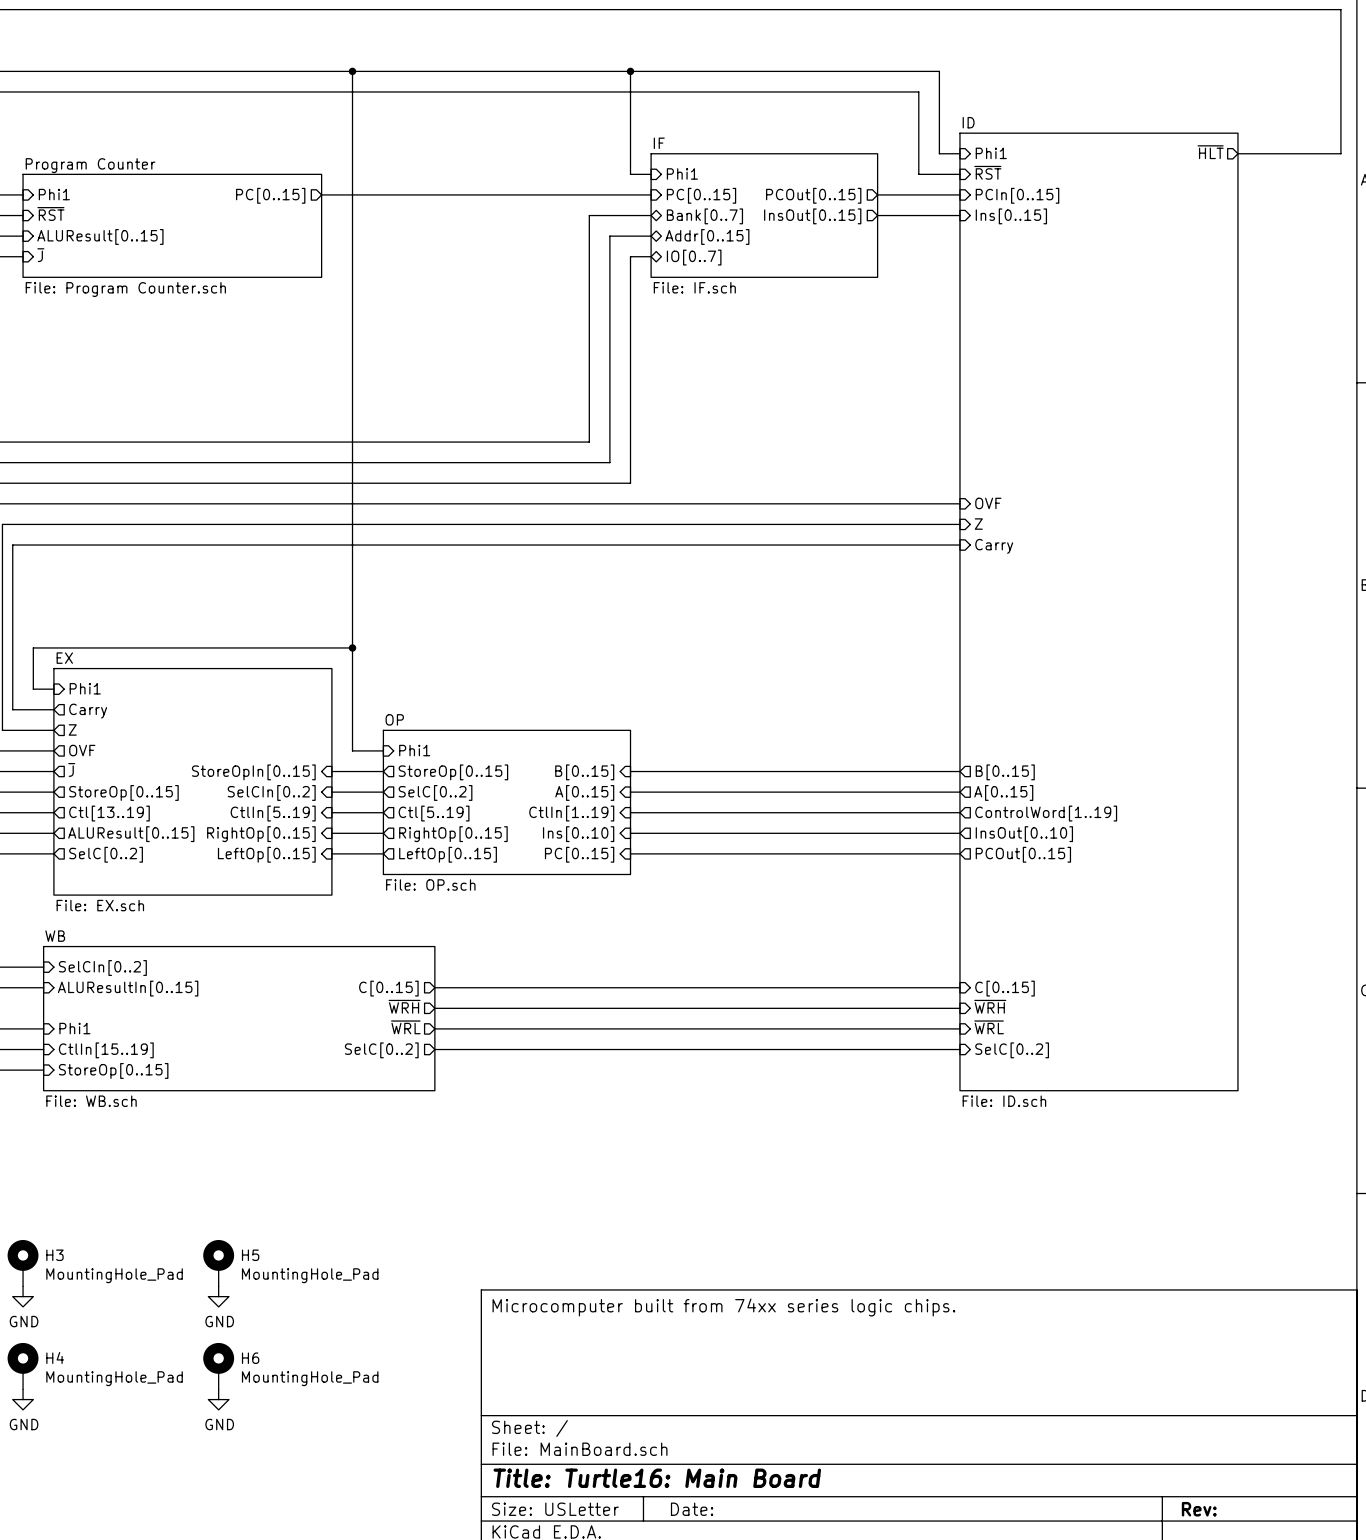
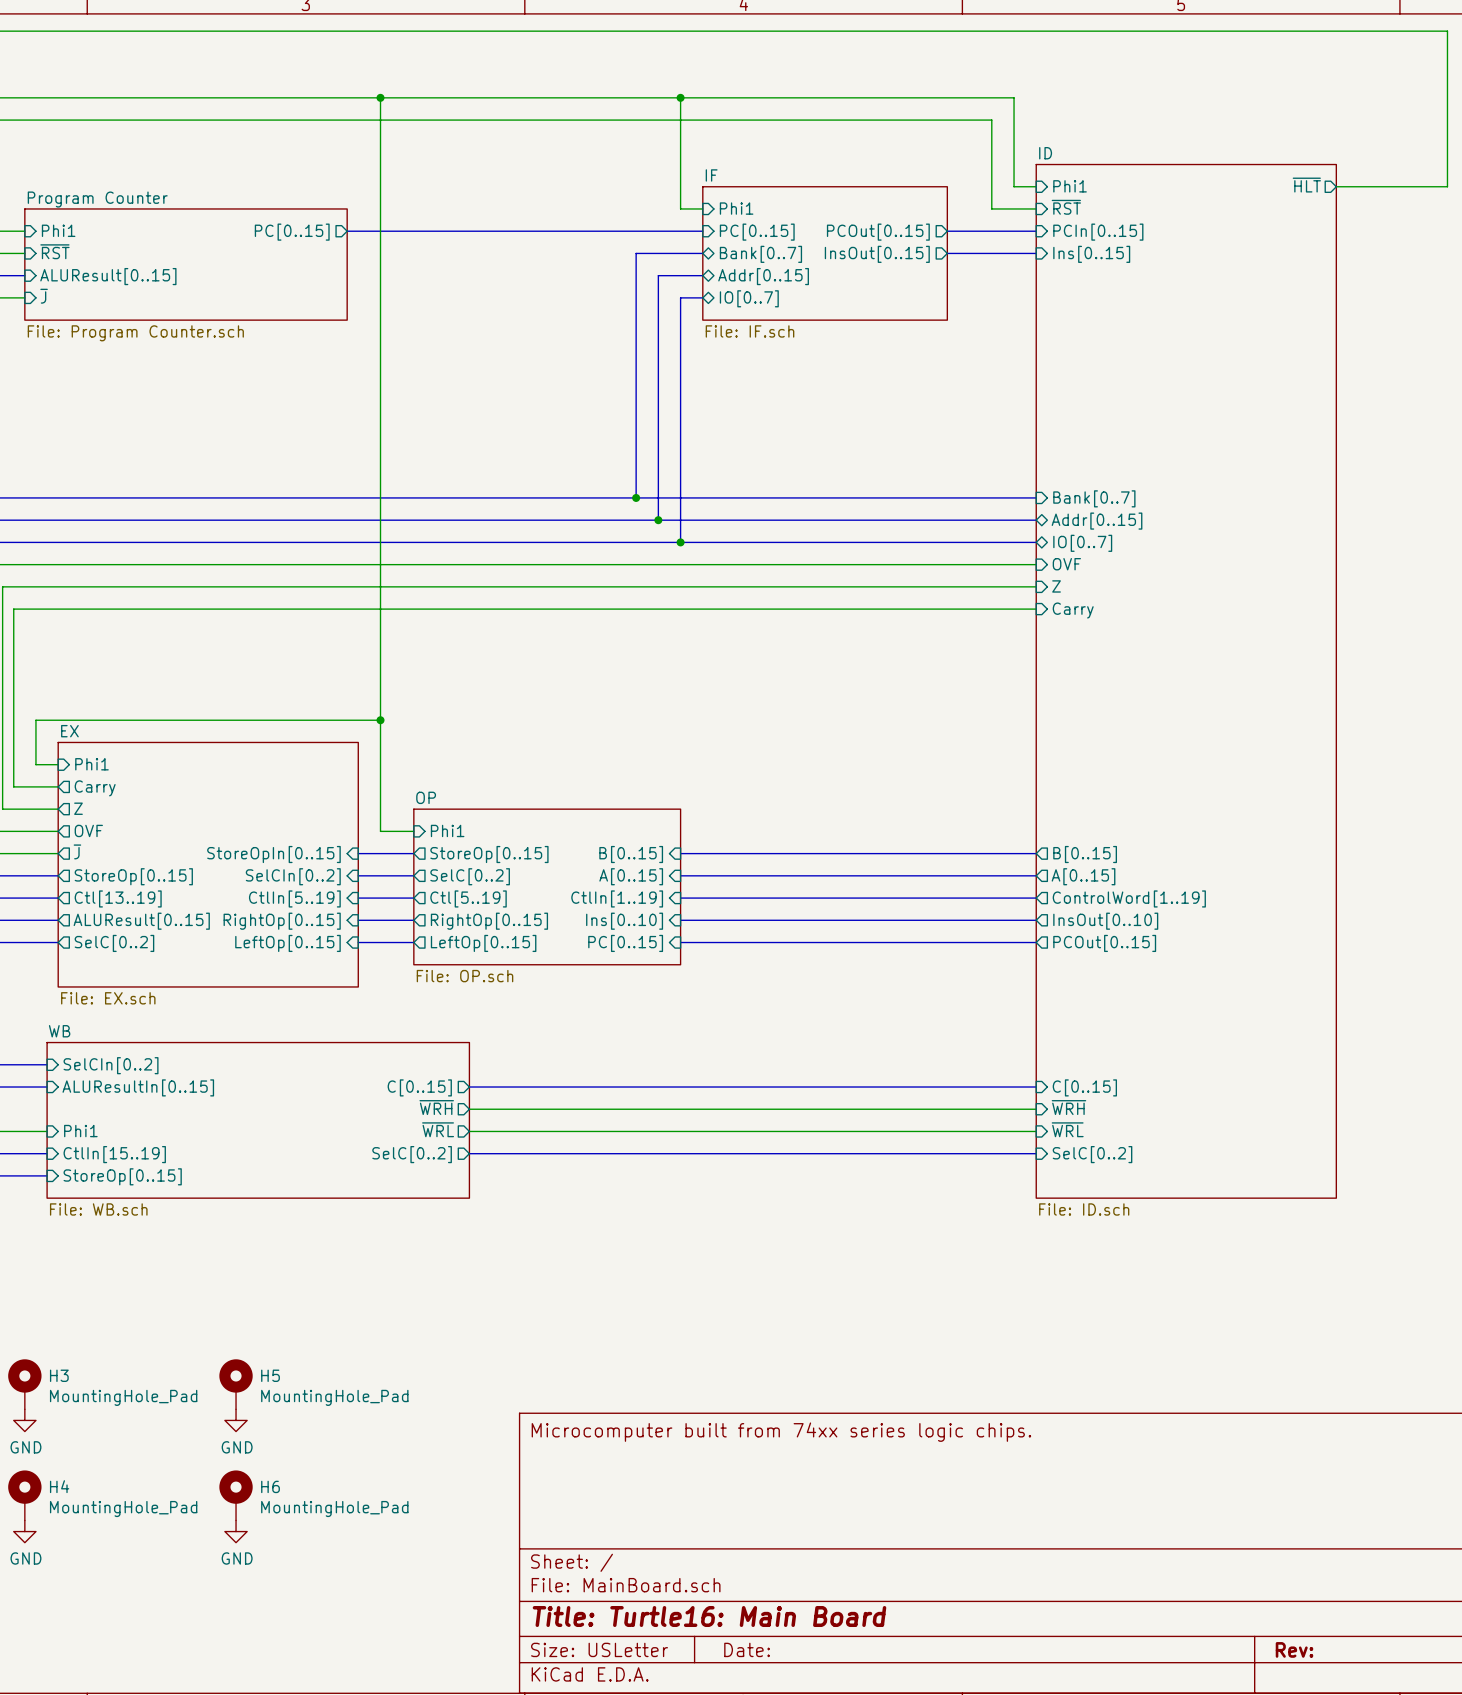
bus: none -> (636, 497) (1036, 497)
junction: none -> (636, 497)
sheet pin: none -> Bank[0..7] (1094, 498)
bus: none -> (658, 520) (1036, 520)
junction: none -> (658, 520)
sheet pin: none -> Addr[0..15] (1097, 521)
bus: none -> (680, 542) (1036, 542)
junction: none -> (680, 542)
sheet pin: none -> IO[0..7] (1082, 543)

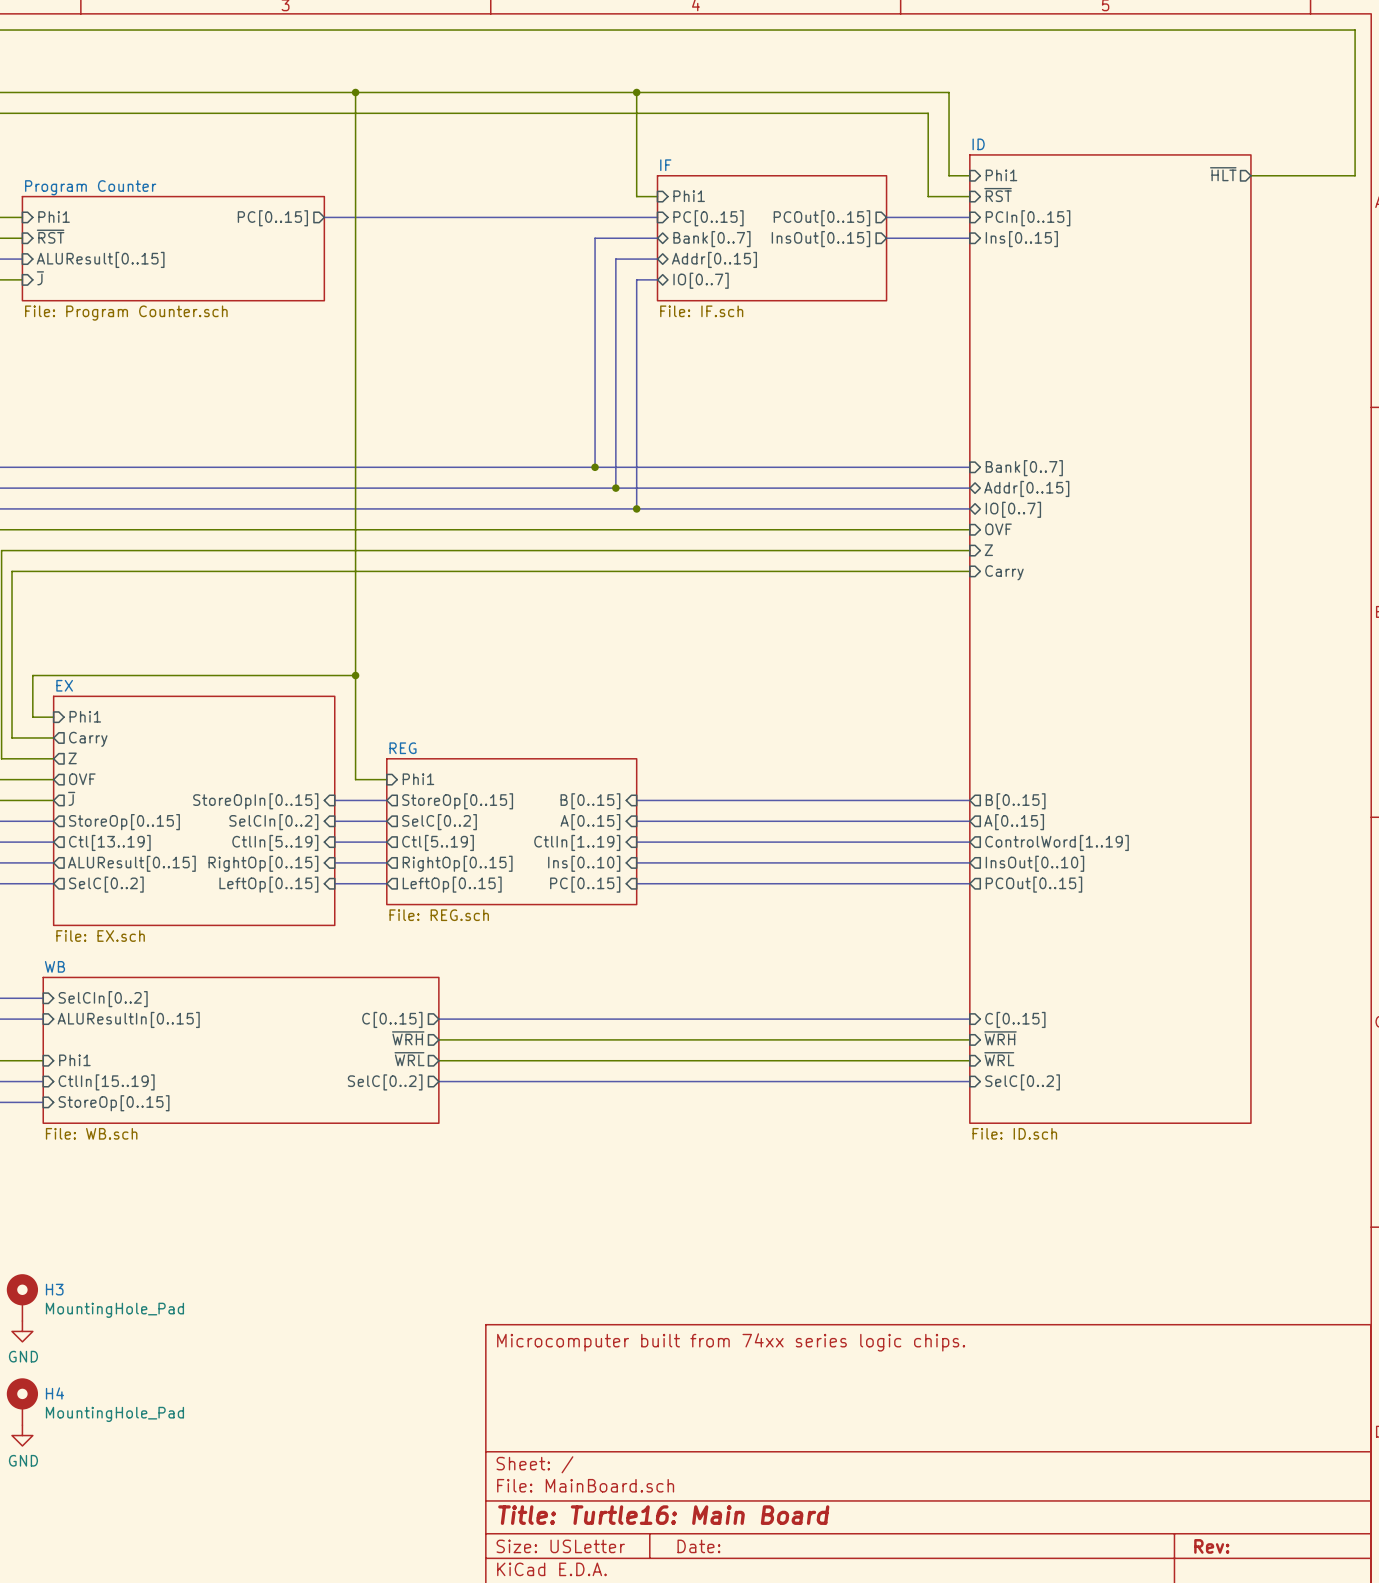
sheet OP name: OP (426, 797) -> REG (403, 748)
sheet OP value: File: OP.sch (465, 976) -> File: REG.sch (439, 915)
H5: MountingHole_Pad (236, 1384) -> none
power symbol: GND (236, 1420) -> none
H6: MountingHole_Pad (236, 1495) -> none
power symbol: GND (236, 1531) -> none

